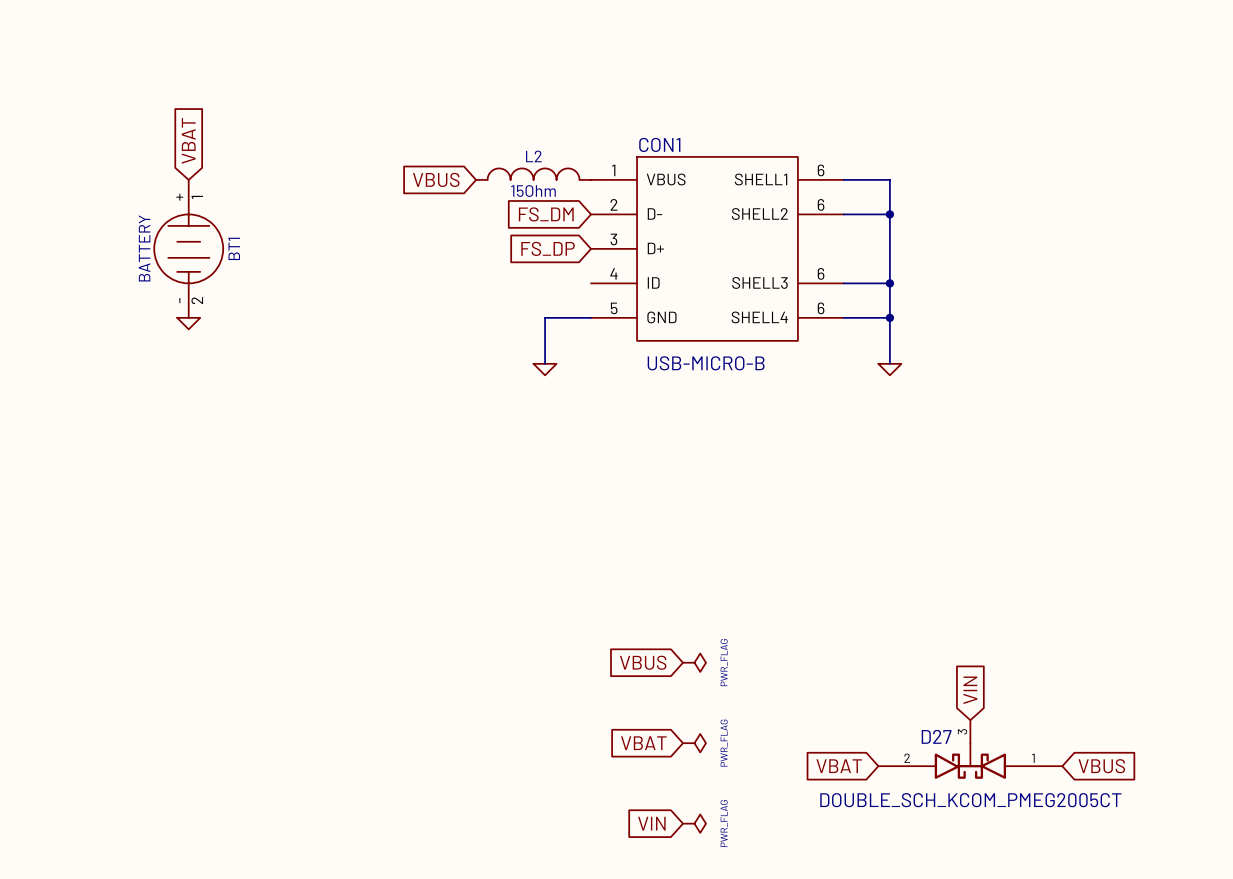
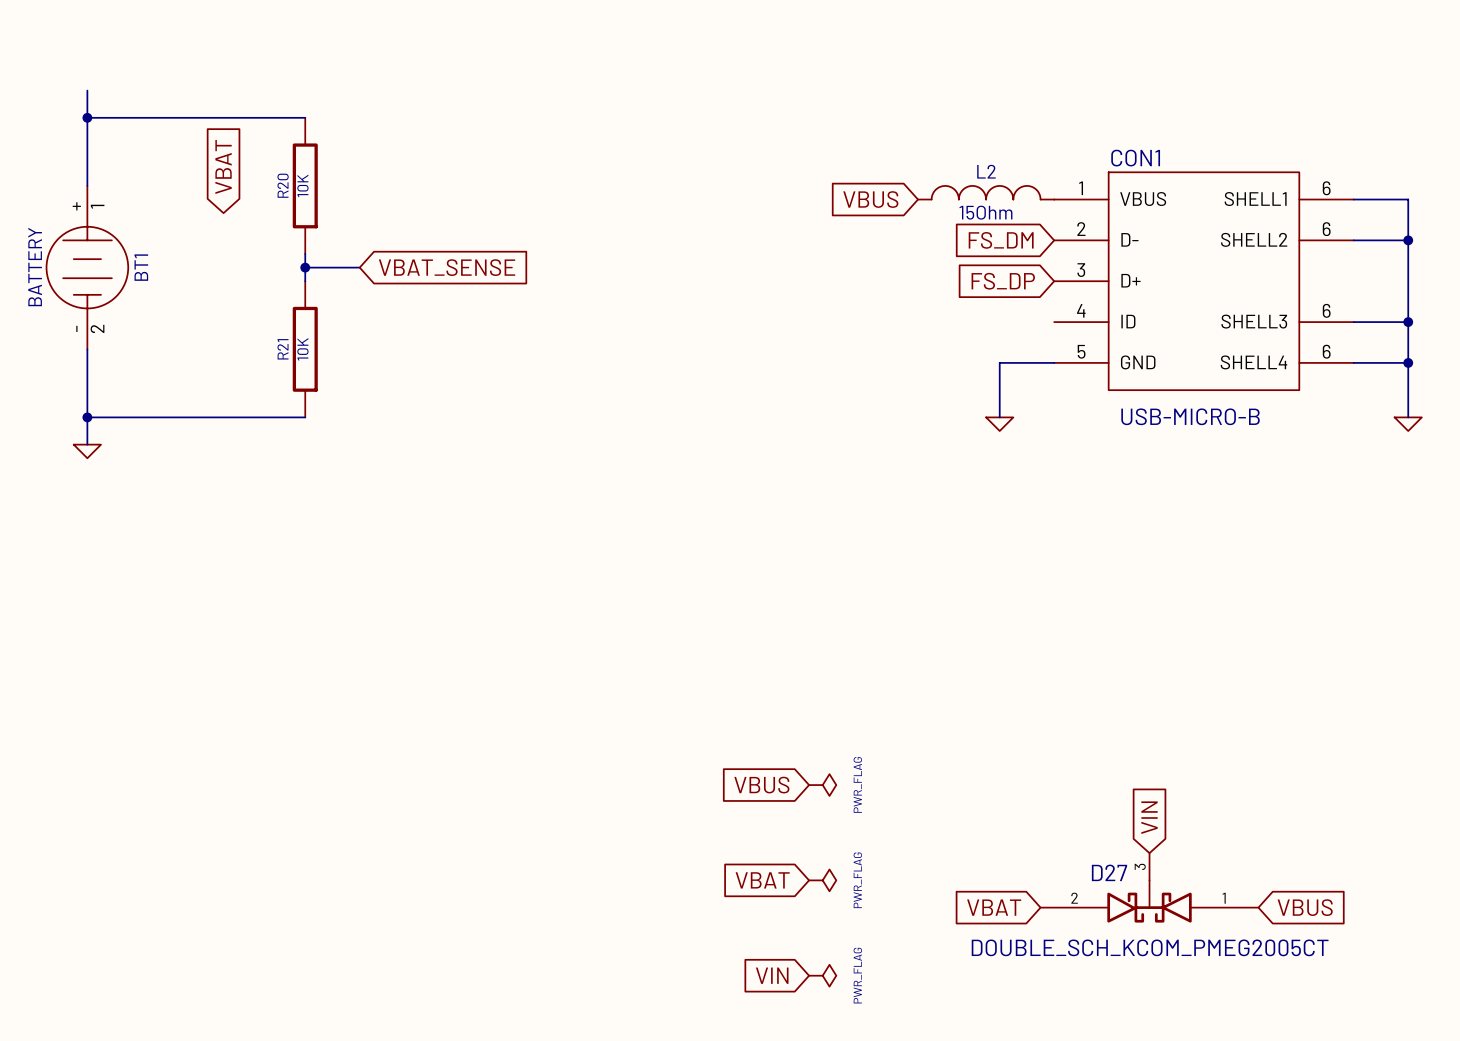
wire: none -> (87, 90) (87, 185)
wire: none -> (87, 117) (305, 117)
junction: none -> (87, 117)
R20: none -> 10K (305, 185)
global label: none -> VBUS (870, 199)
wire: none -> (1353, 199) (1408, 199) (1408, 417)
L2 position: (533, 174) -> (986, 192)
global label: VBUS (436, 179) -> none
wire: (843, 179) (889, 179) (889, 363) -> none
global label: none -> FS_DM (1001, 240)
wire: none -> (1353, 240) (1408, 240)
junction: none -> (1408, 240)
wire: none -> (305, 253) (305, 281)
global label: FS_DM (546, 214) -> none
wire: (843, 214) (889, 214) -> none
junction: (889, 214) -> none
wire: none -> (305, 267) (359, 267)
junction: none -> (305, 267)
global label: none -> VBAT_SENSE (447, 267)
global label: none -> FS_DP (1003, 281)
BT1 position: (188, 248) -> (87, 267)
global label: FS_DP (548, 248) -> none
CON1 position: (717, 248) -> (1203, 281)
wire: none -> (1353, 322) (1408, 322)
junction: none -> (1408, 322)
wire: (843, 283) (889, 283) -> none
junction: (889, 283) -> none
wire: none -> (87, 349) (87, 444)
R21: none -> 10K (305, 349)
wire: none -> (1054, 362) (999, 362) (999, 417)
wire: none -> (1353, 362) (1408, 362)
junction: none -> (1408, 362)
wire: (591, 317) (545, 317) (545, 363) -> none
wire: (843, 317) (889, 317) -> none
junction: (889, 317) -> none
power symbol position: (188, 323) -> (87, 451)
wire: none -> (87, 417) (305, 417)
junction: none -> (87, 417)
power symbol: none -> (1408, 424)
power symbol: (545, 369) -> none
power symbol position: (889, 369) -> (999, 424)

